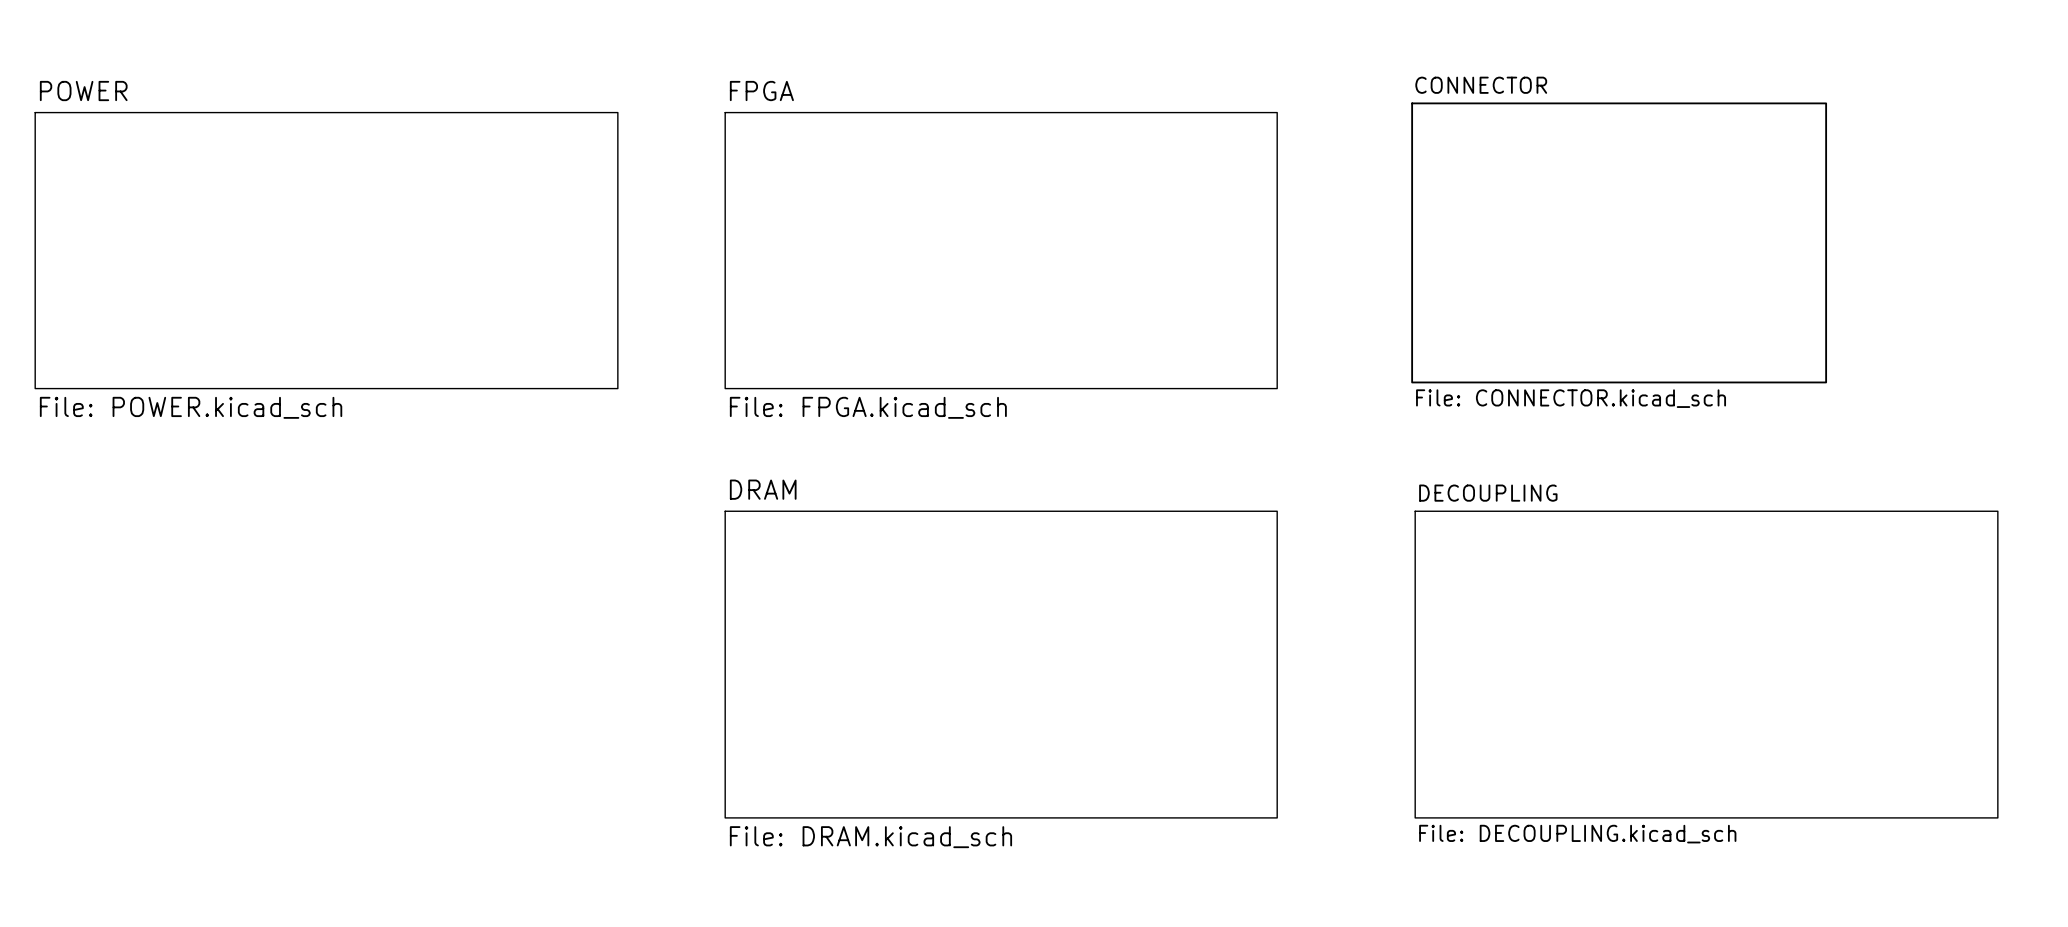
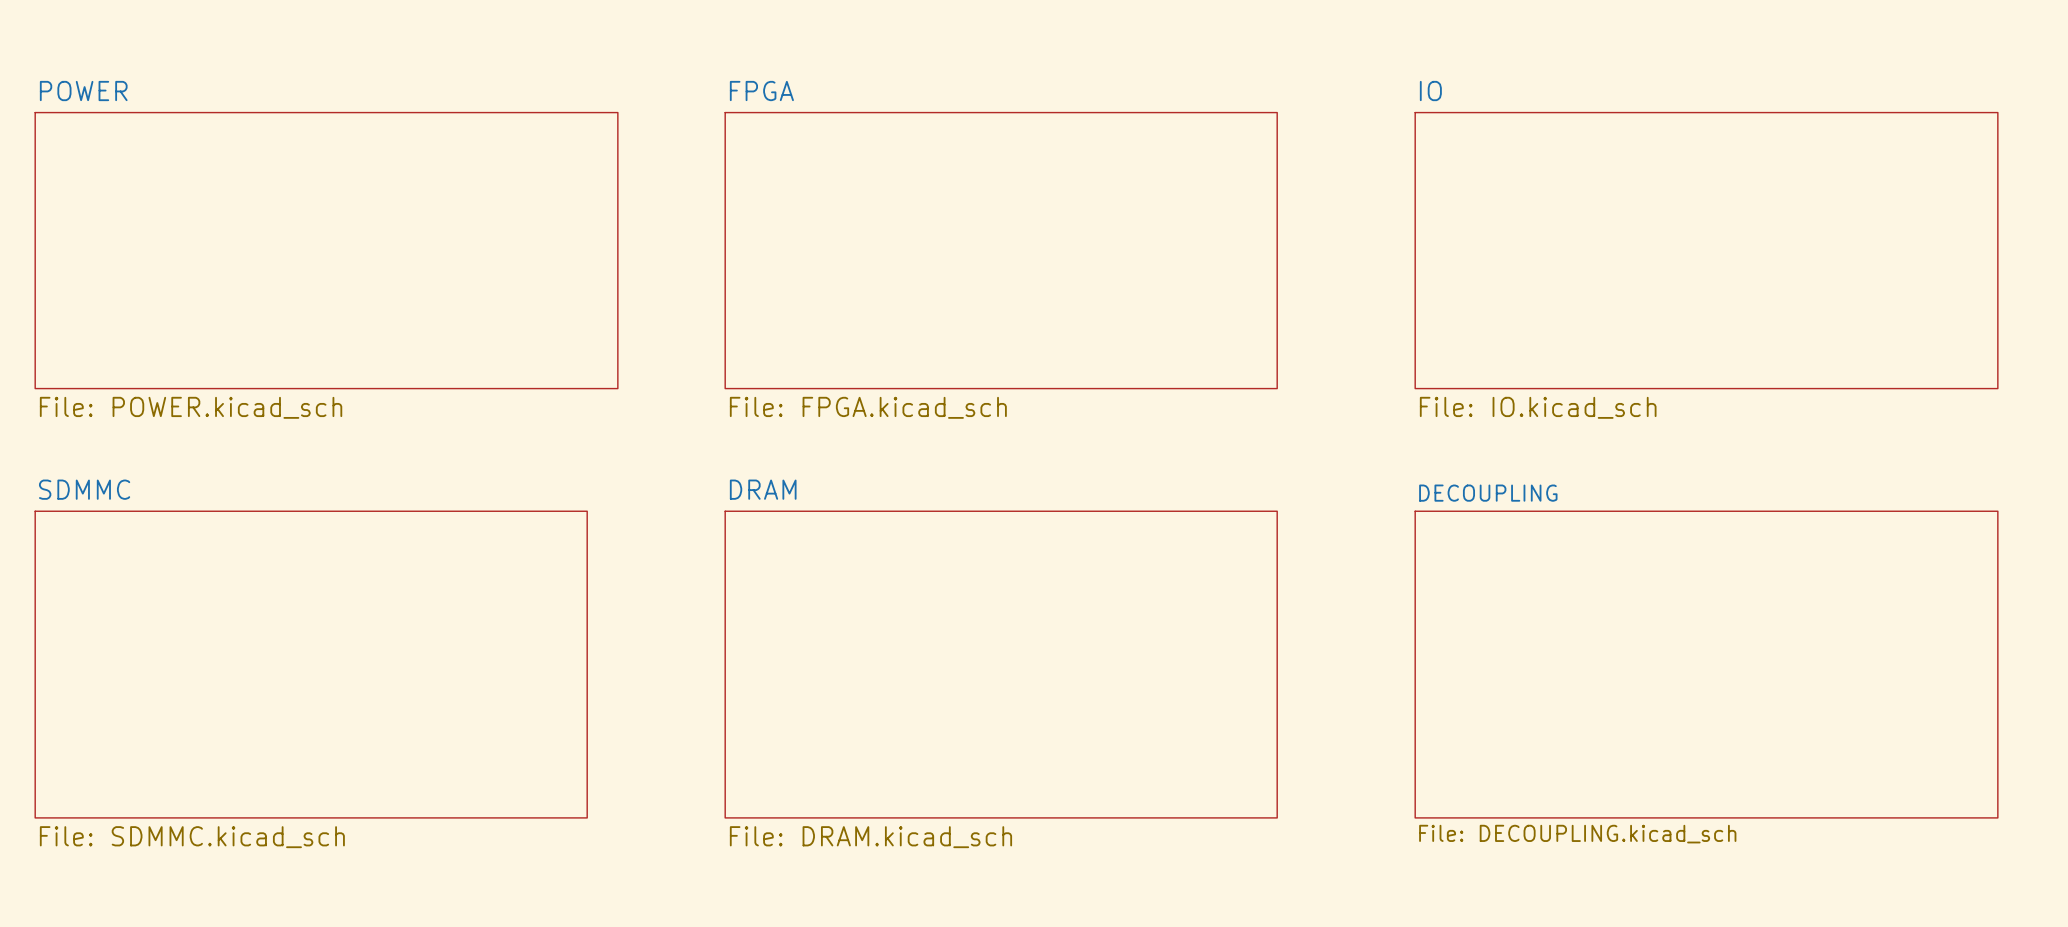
sheet CONNECTOR: File: CONNECTOR.kicad_sch (1619, 242) -> none
sheet IO: none -> File: IO.kicad_sch (1706, 250)
sheet SDMMC: none -> File: SDMMC.kicad_sch (311, 664)

